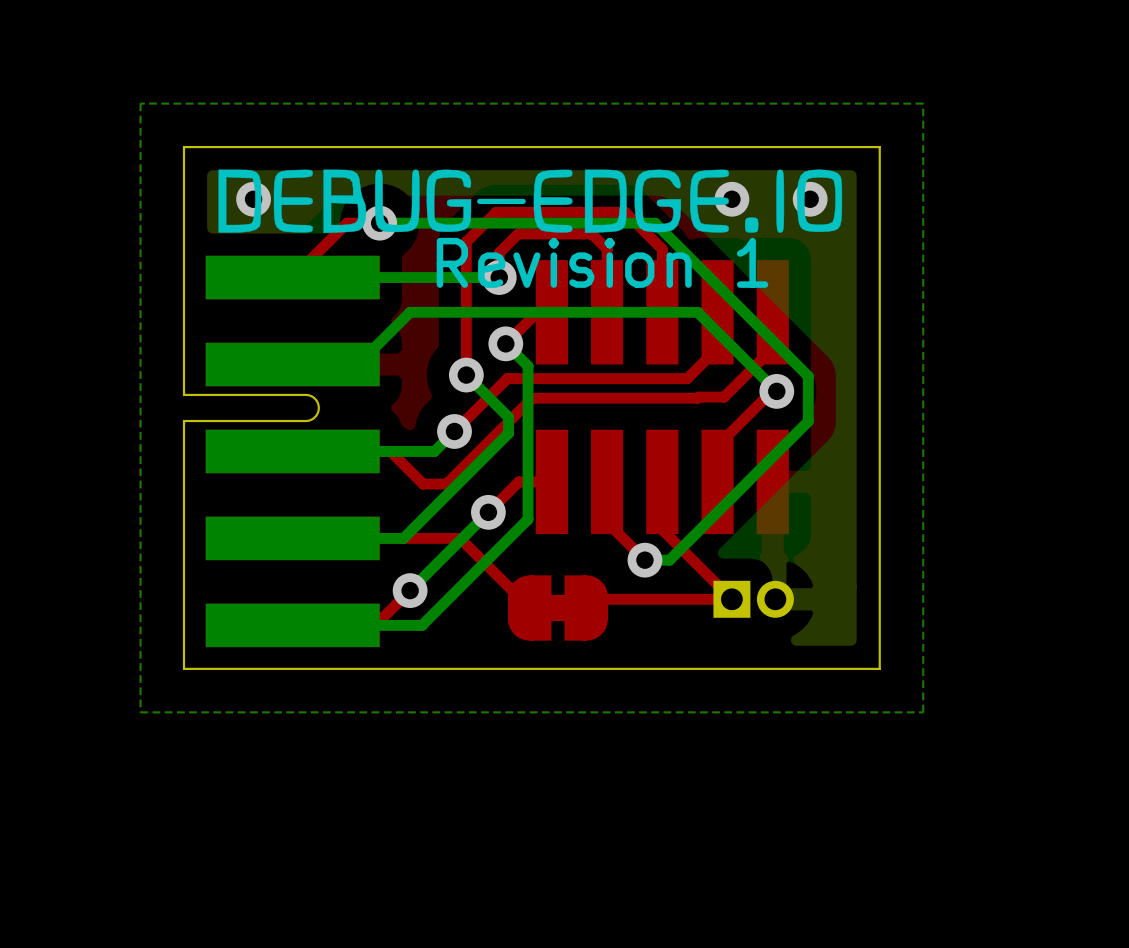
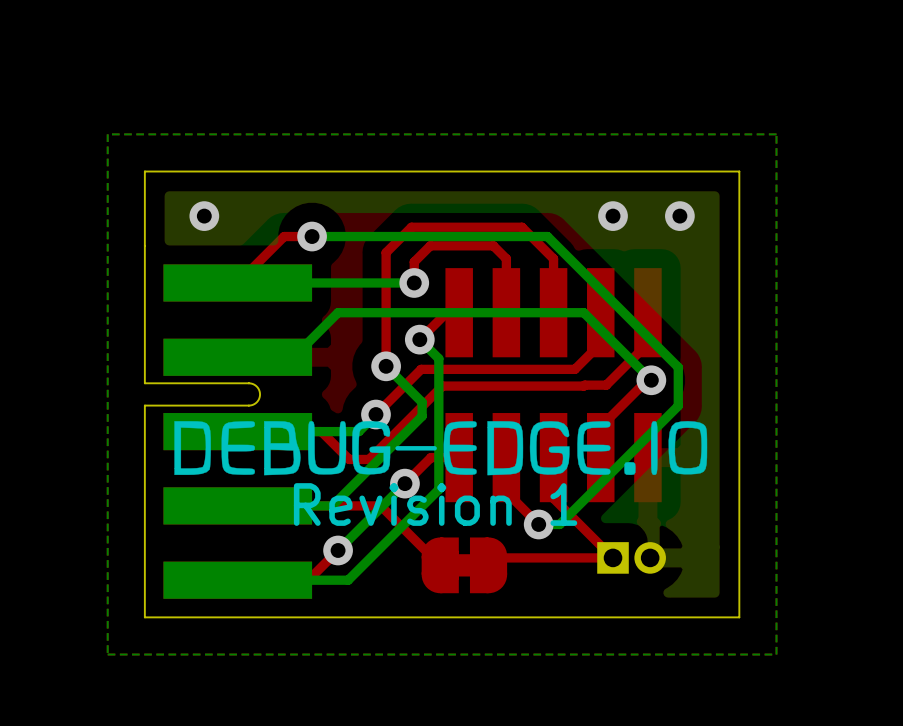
drawing position: (530, 201) -> (440, 448)
text position: Revision 1 (602, 262) -> Revision 1 (435, 504)

